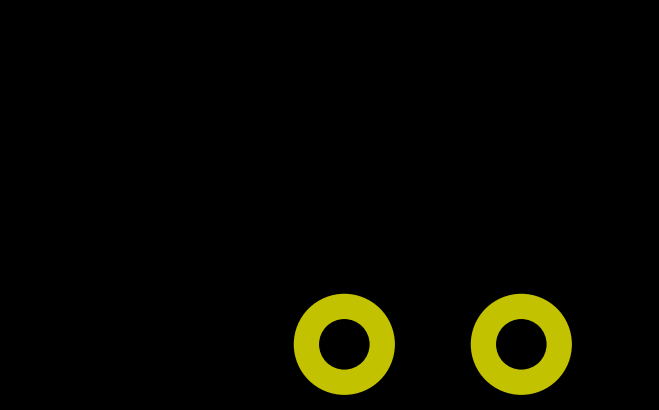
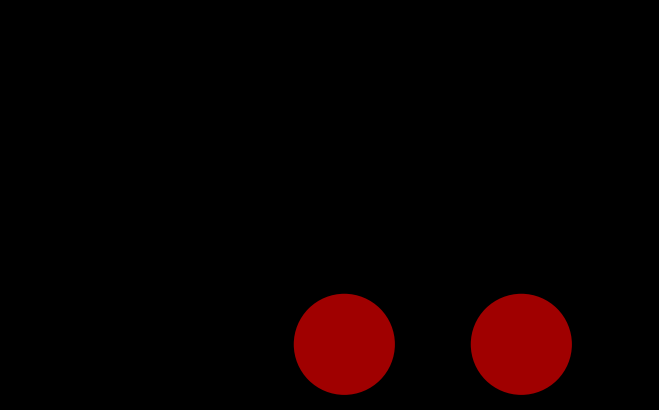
part footprint: [293, 293, 395, 395] -> [293, 293, 395, 395]
part footprint: [470, 293, 572, 395] -> [470, 293, 572, 395]

